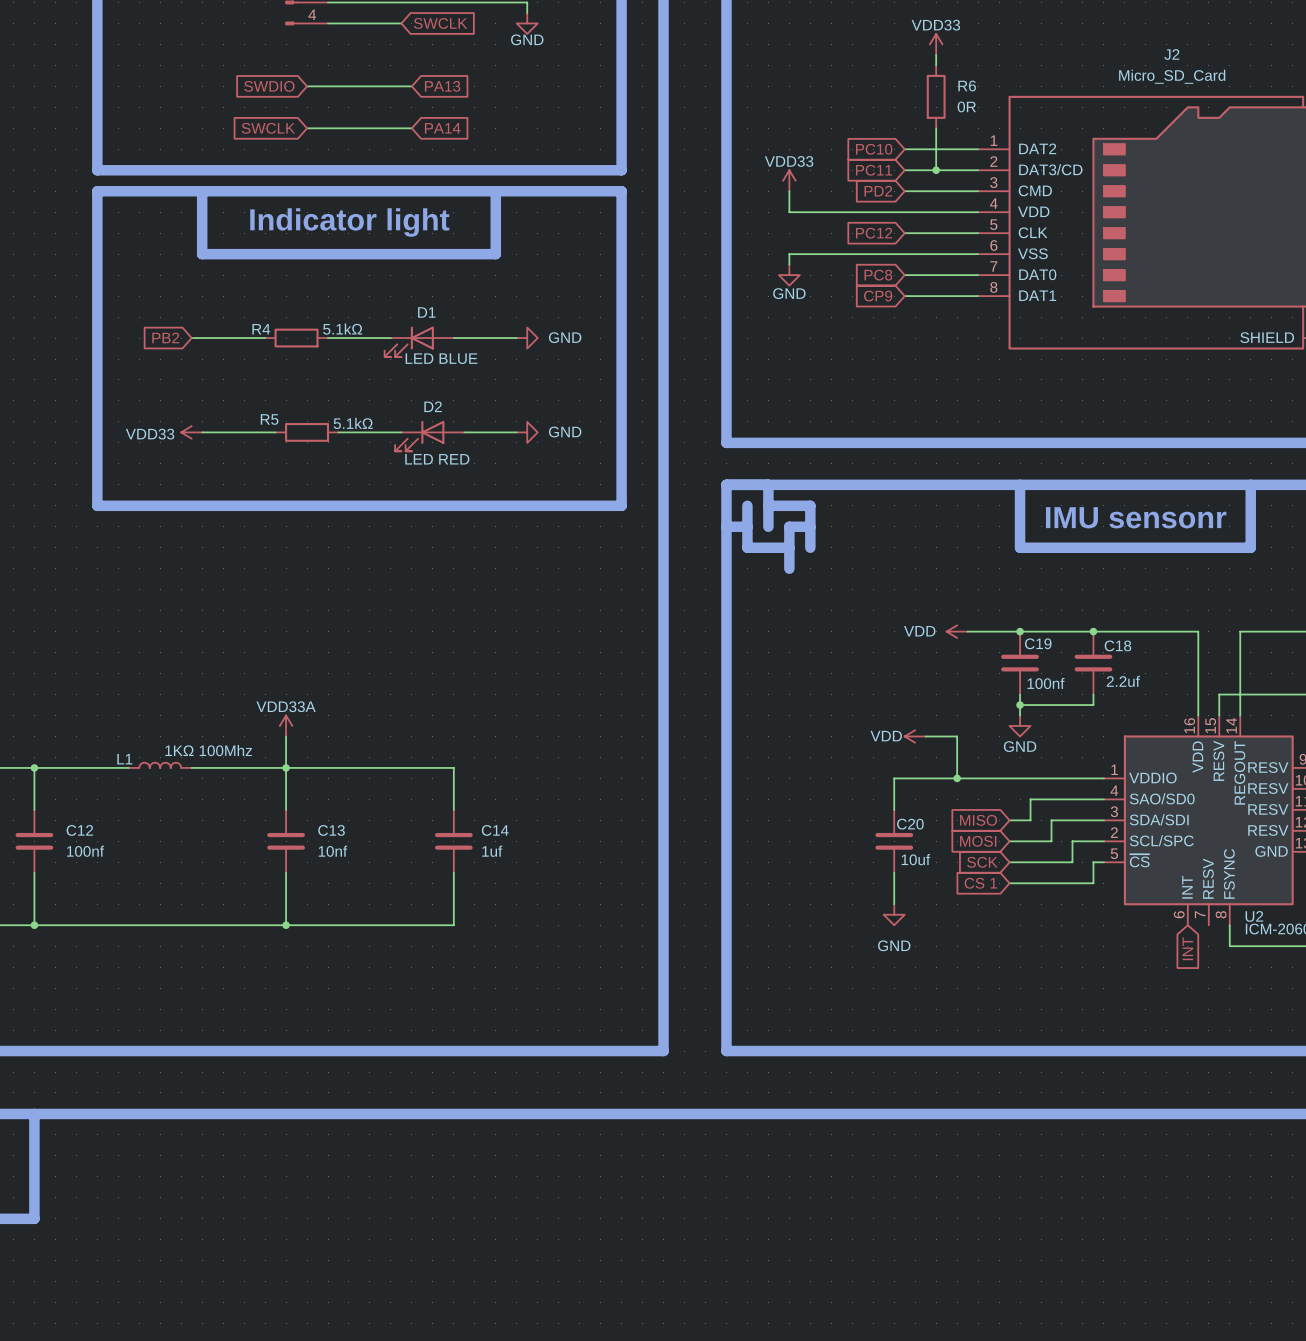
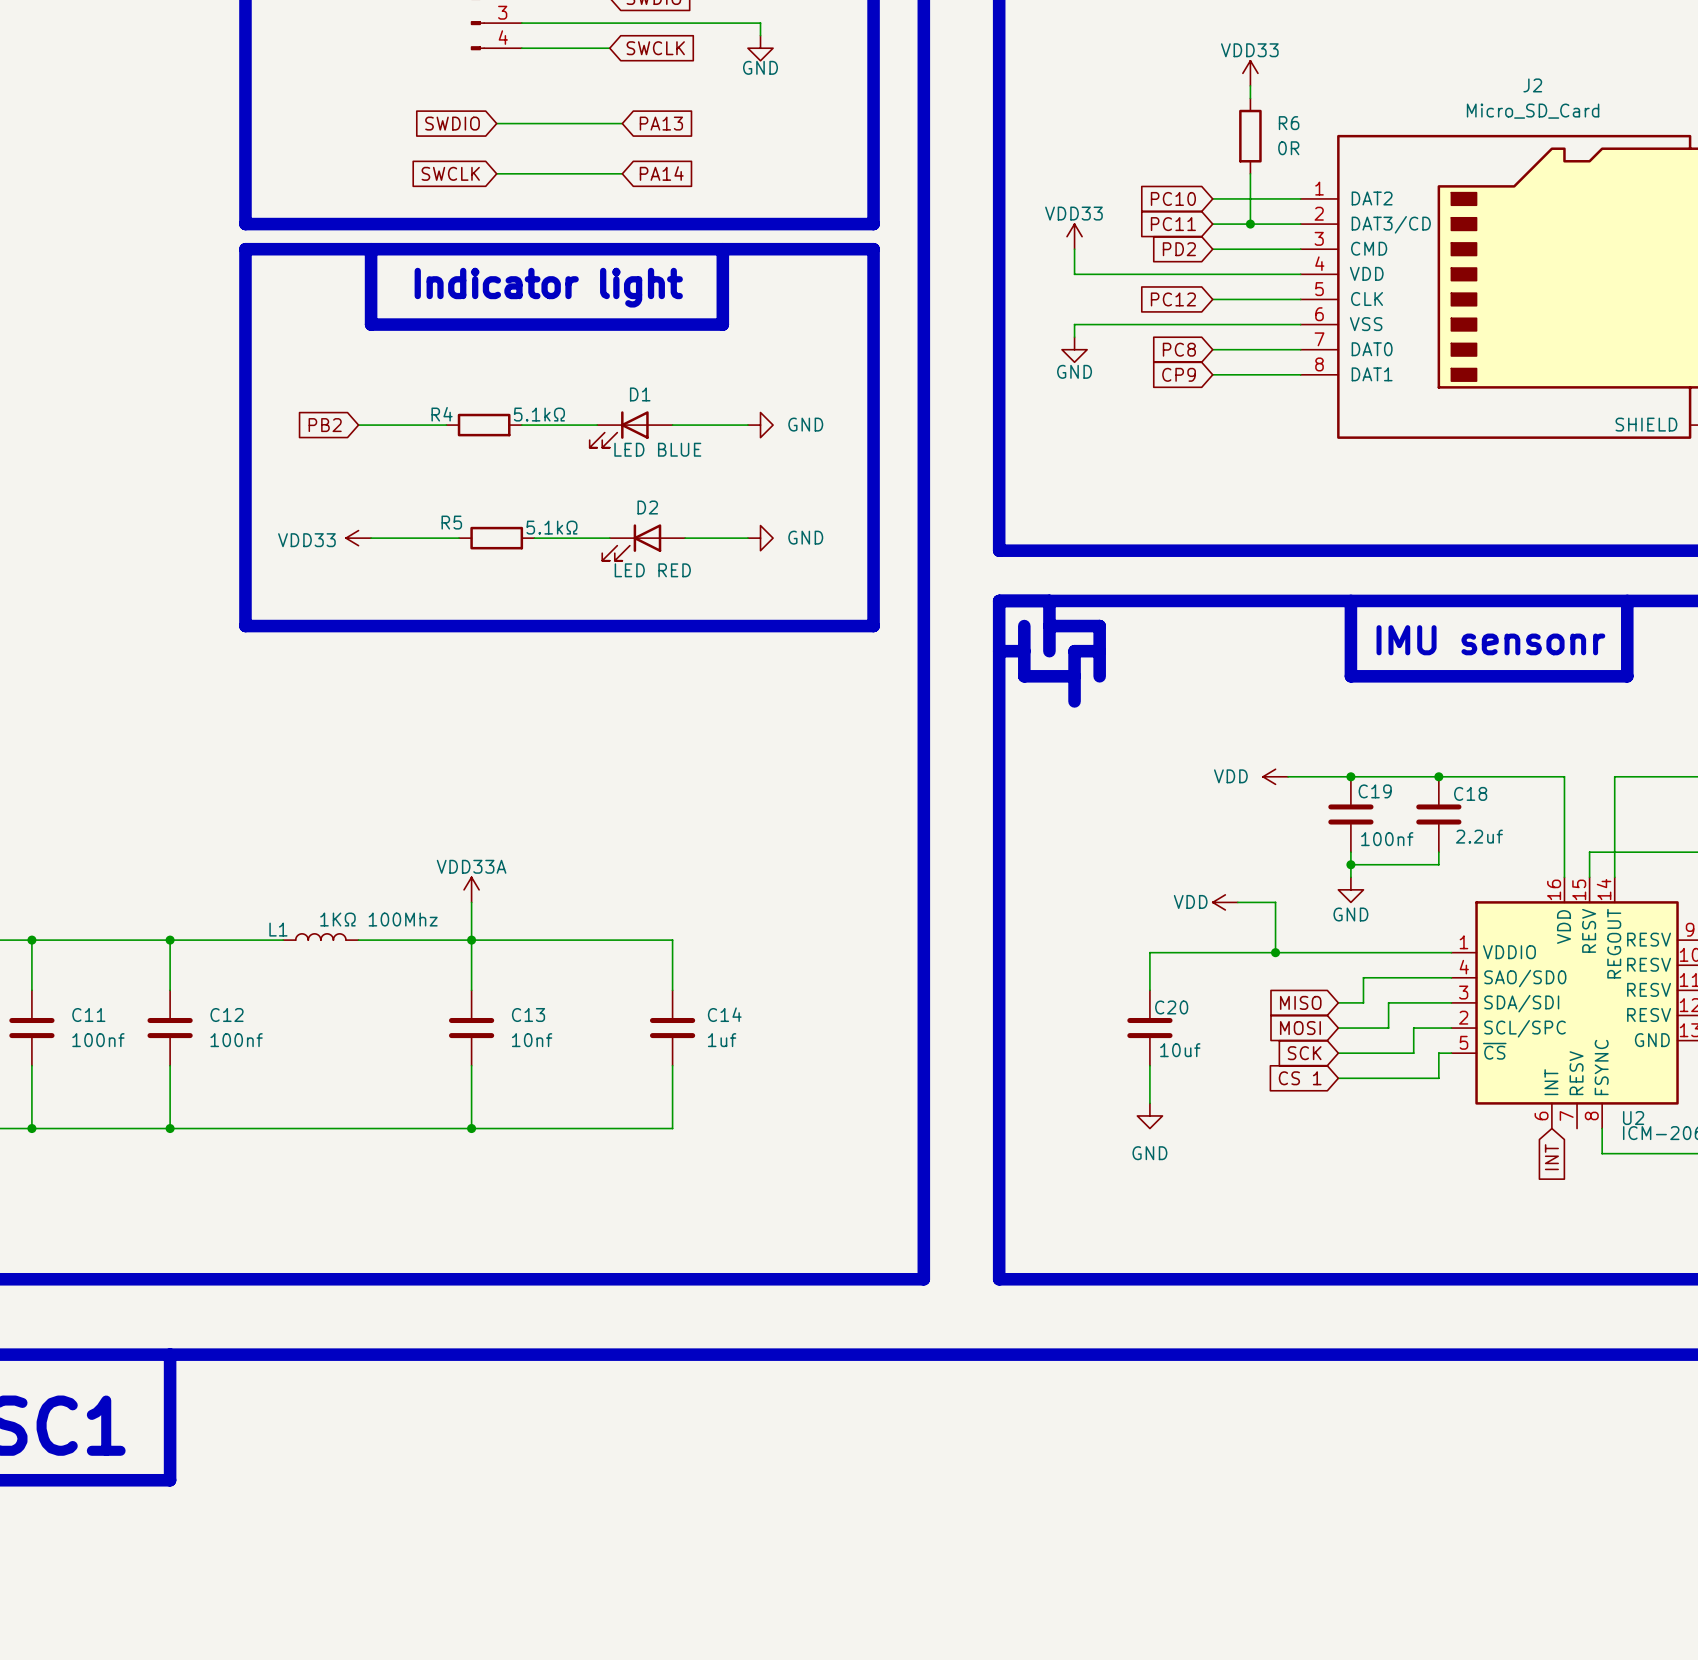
wire: (894, 778) (894, 809) -> (1200, 952) (1149, 952) (1149, 990)
C20 position: (894, 841) -> (1149, 1028)
wire: (894, 872) (894, 904) -> (1149, 1065) (1149, 1103)
power symbol position: GND (894, 914) -> GND (1149, 1115)

